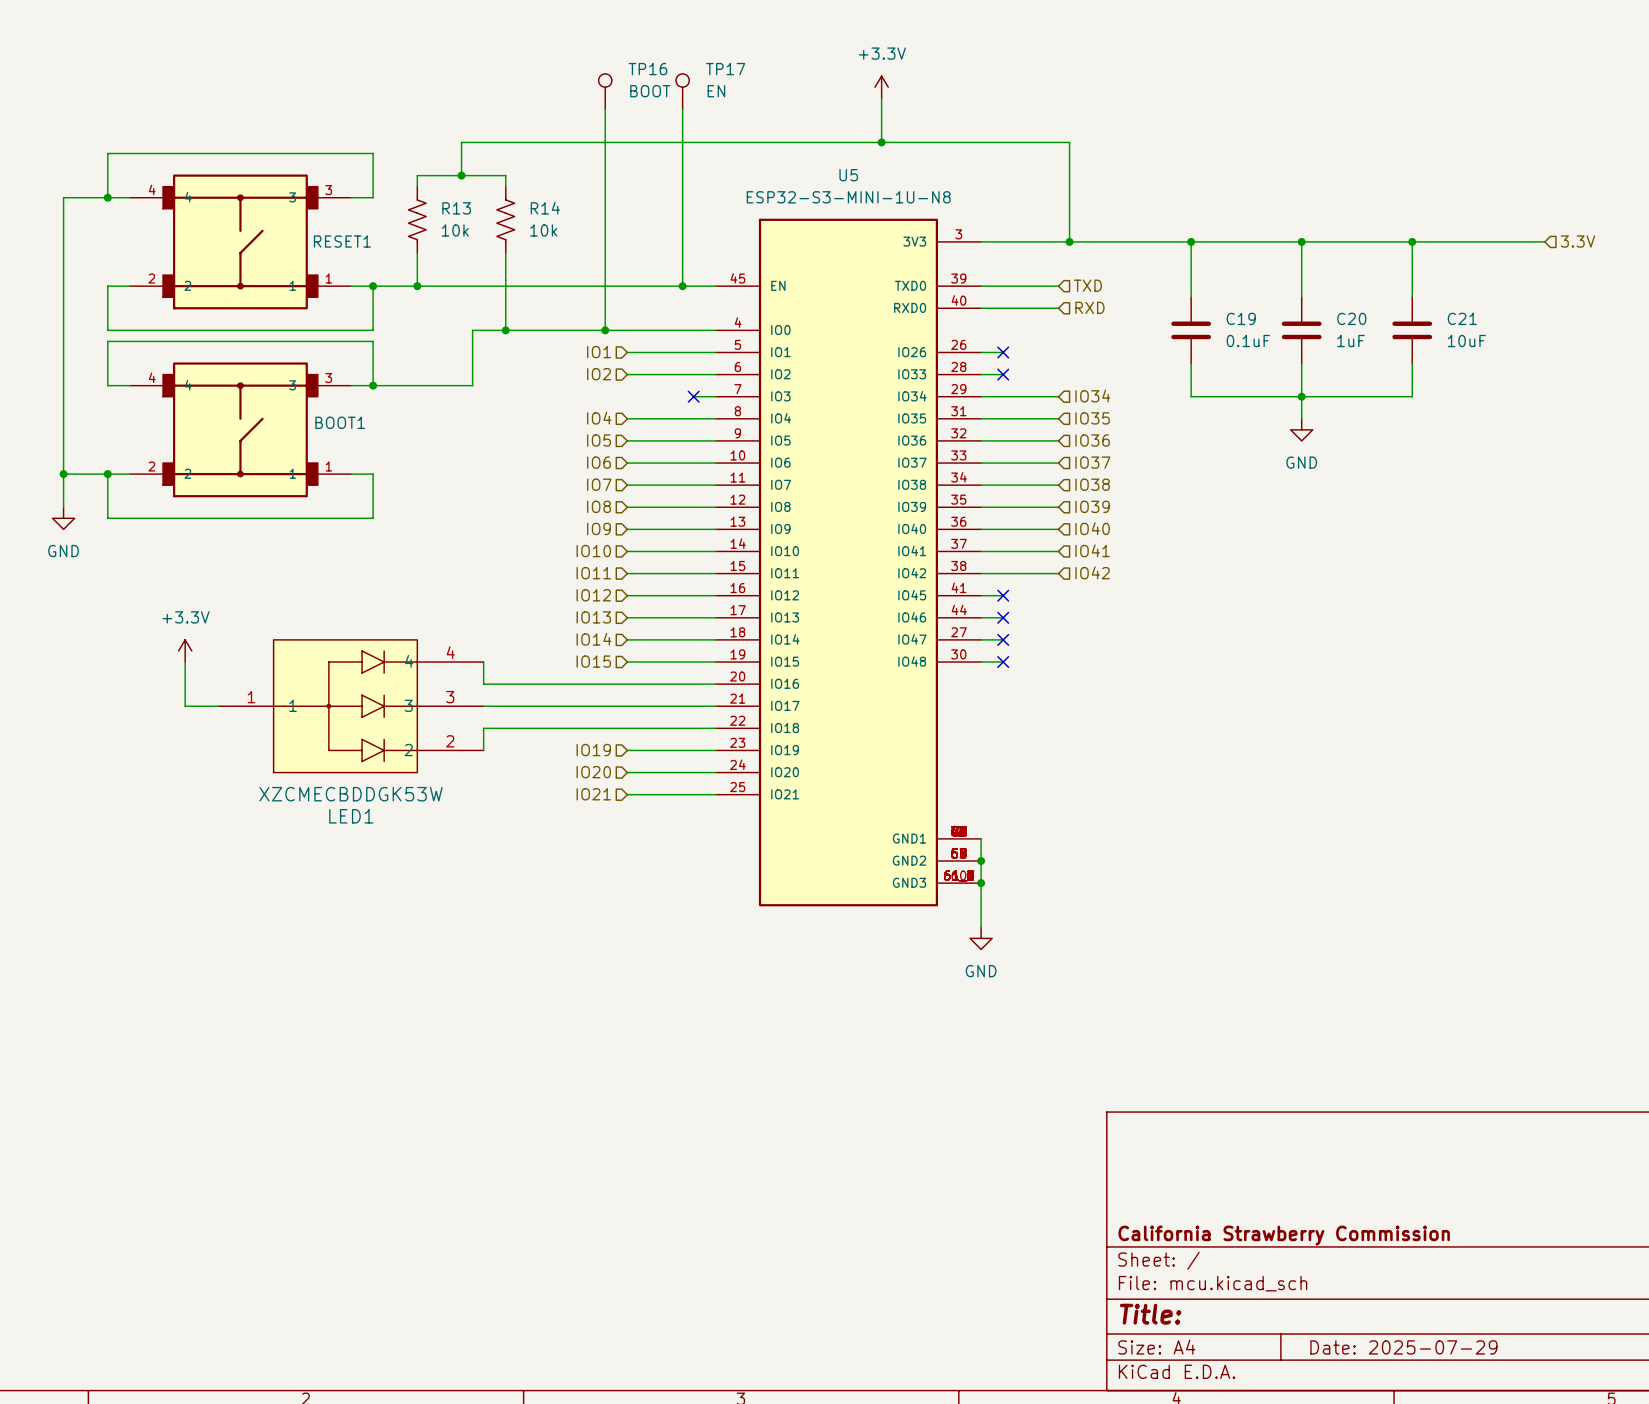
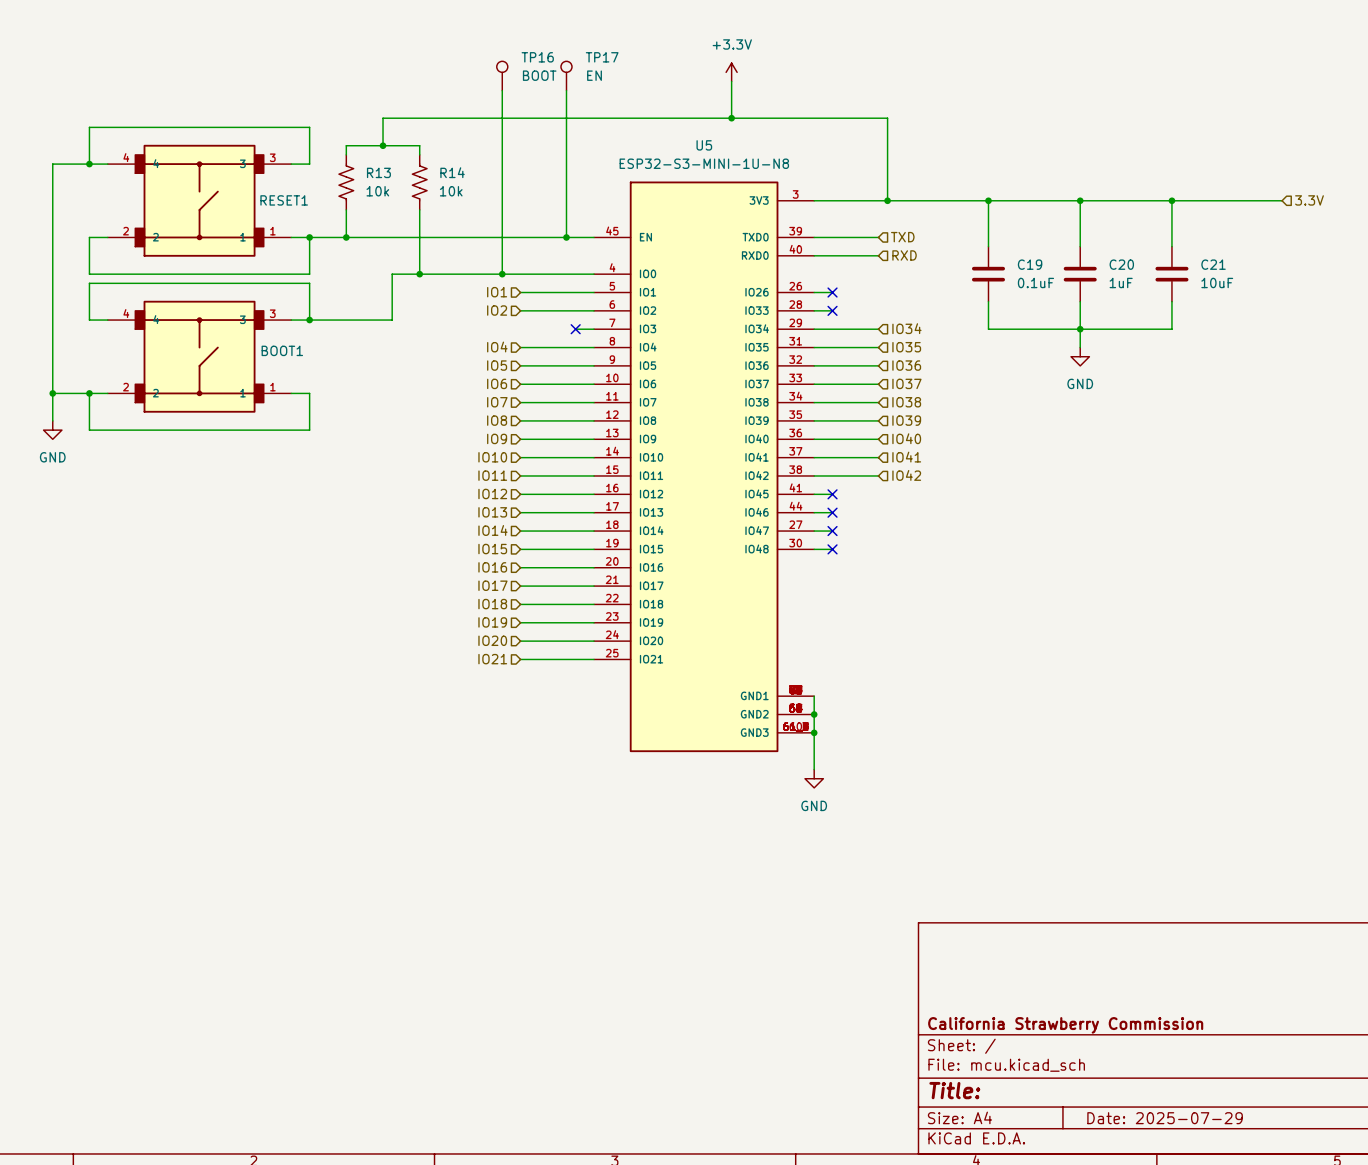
power symbol: +3.3V (185, 650) -> none
wire: (185, 662) (185, 706) (218, 706) -> none
wire: (483, 662) (483, 684) (627, 684) -> none
hierarchical label: none -> IO16 (492, 567)
hierarchical label: none -> IO17 (492, 585)
LED1: XZCMECBDDGK53W (350, 706) -> none
wire: (483, 706) (627, 706) -> none
hierarchical label: none -> IO18 (492, 604)
wire: (627, 728) (483, 728) (483, 750) -> none

